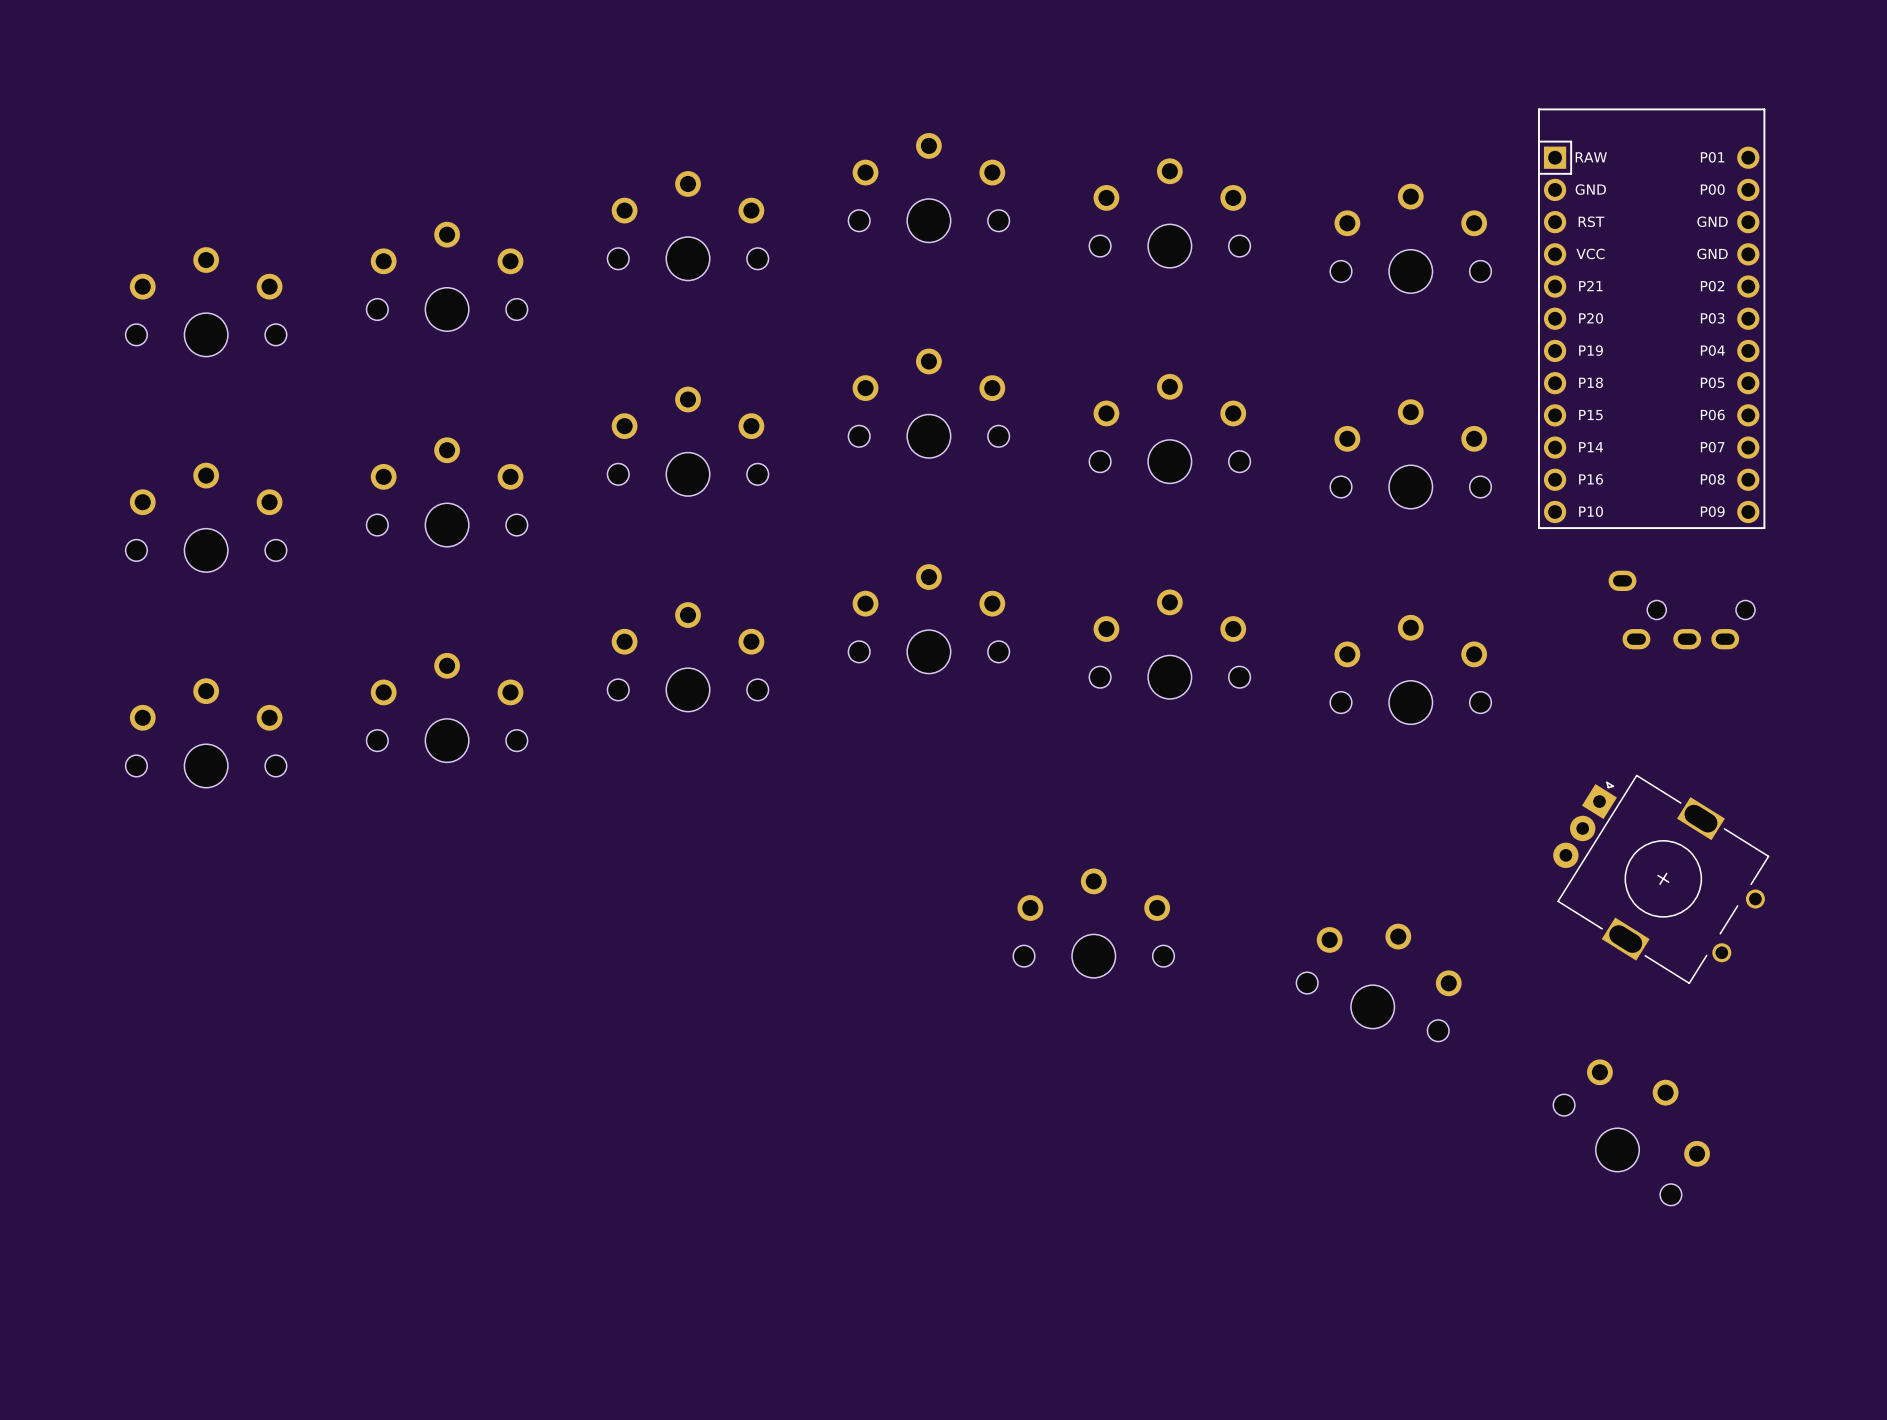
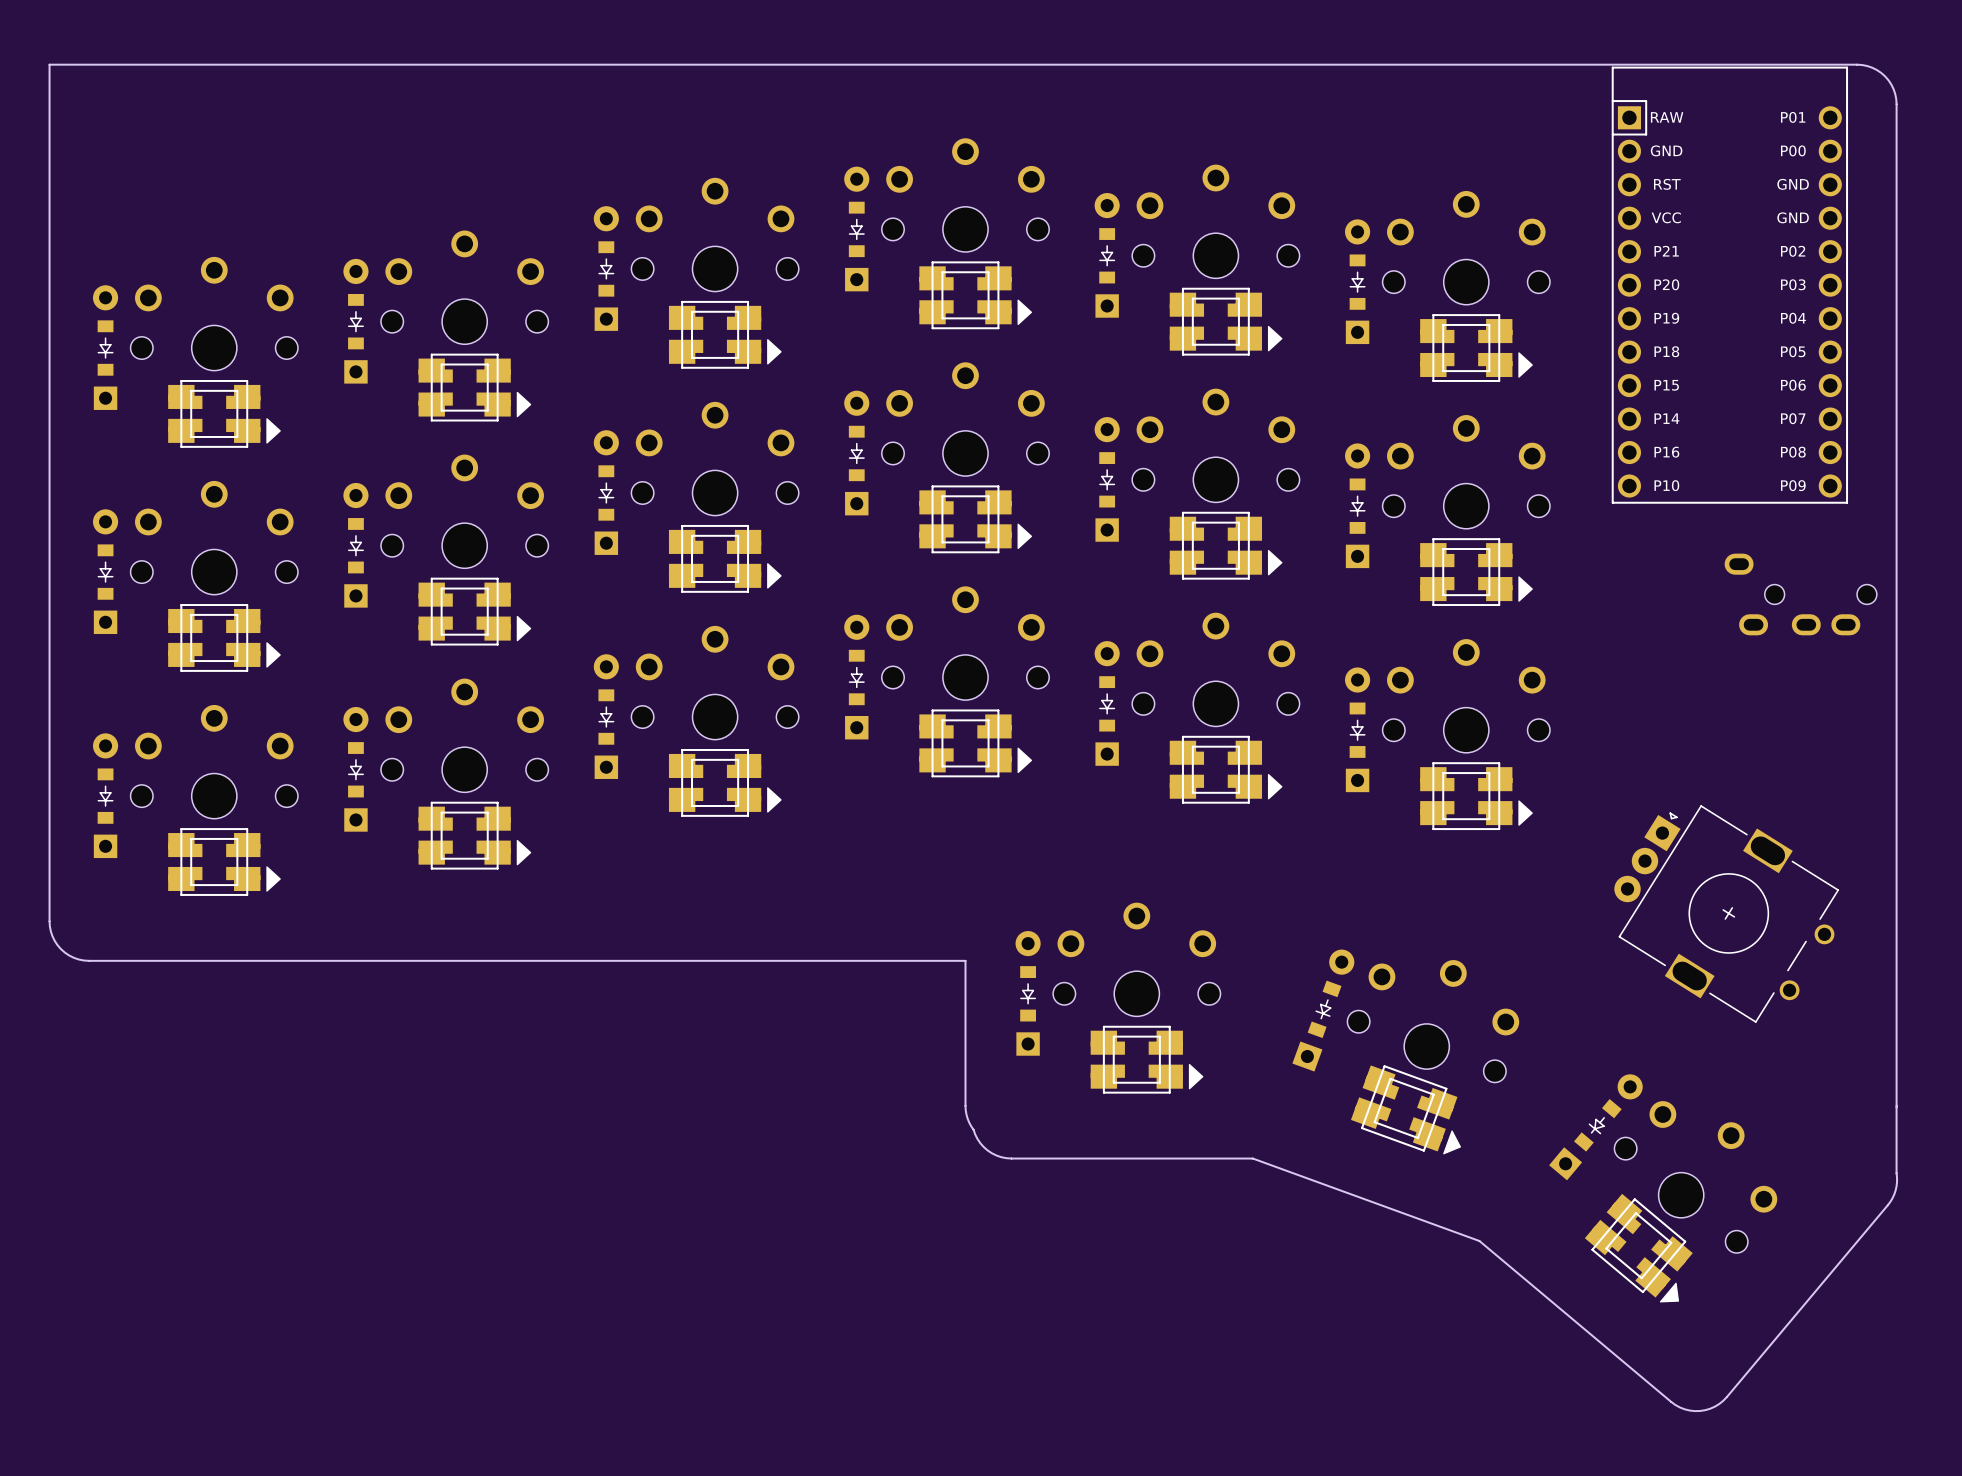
board edge: none -> (49, 64) (49, 921) (54, 941) (69, 955) (89, 960) (965, 960) (965, 1110) (977, 1139) (992, 1153) (1011, 1158) (1252, 1158) (1479, 1241) (1671, 1401) (1689, 1410) (1705, 1410) (1723, 1400) (1890, 1201) (1897, 1181) (1896, 104) (1891, 84) (1876, 69) (1857, 64) (49, 64)
part: none -> (856, 229)
part: none -> (1107, 255)
part: none -> (606, 268)
part: none -> (1357, 281)
part: none -> (975, 295)
part: none -> (355, 321)
part: none -> (1226, 321)
part position: (1651, 318) -> (1729, 285)
part: none -> (725, 334)
part: none -> (105, 347)
part: none -> (1476, 348)
part: none -> (474, 387)
part: none -> (224, 413)
part: none -> (856, 453)
part: none -> (1107, 479)
part: none -> (606, 492)
part: none -> (1357, 505)
part: none -> (975, 519)
part: none -> (355, 545)
part: none -> (1226, 545)
part: none -> (725, 558)
part: none -> (105, 571)
part: none -> (1476, 572)
part: none -> (474, 611)
part position: (1681, 610) -> (1800, 594)
part: none -> (224, 637)
part: none -> (856, 677)
part: none -> (1107, 703)
part: none -> (606, 716)
part: none -> (1357, 729)
part: none -> (975, 743)
part: none -> (355, 769)
part: none -> (1226, 769)
part: none -> (725, 782)
part: none -> (105, 795)
part: none -> (1476, 796)
part: none -> (474, 835)
part: none -> (224, 862)
part: none -> (1028, 993)
part: none -> (1323, 1010)
part: none -> (1147, 1059)
part: none -> (1405, 1109)
part: none -> (1595, 1127)
part: none -> (1638, 1248)

